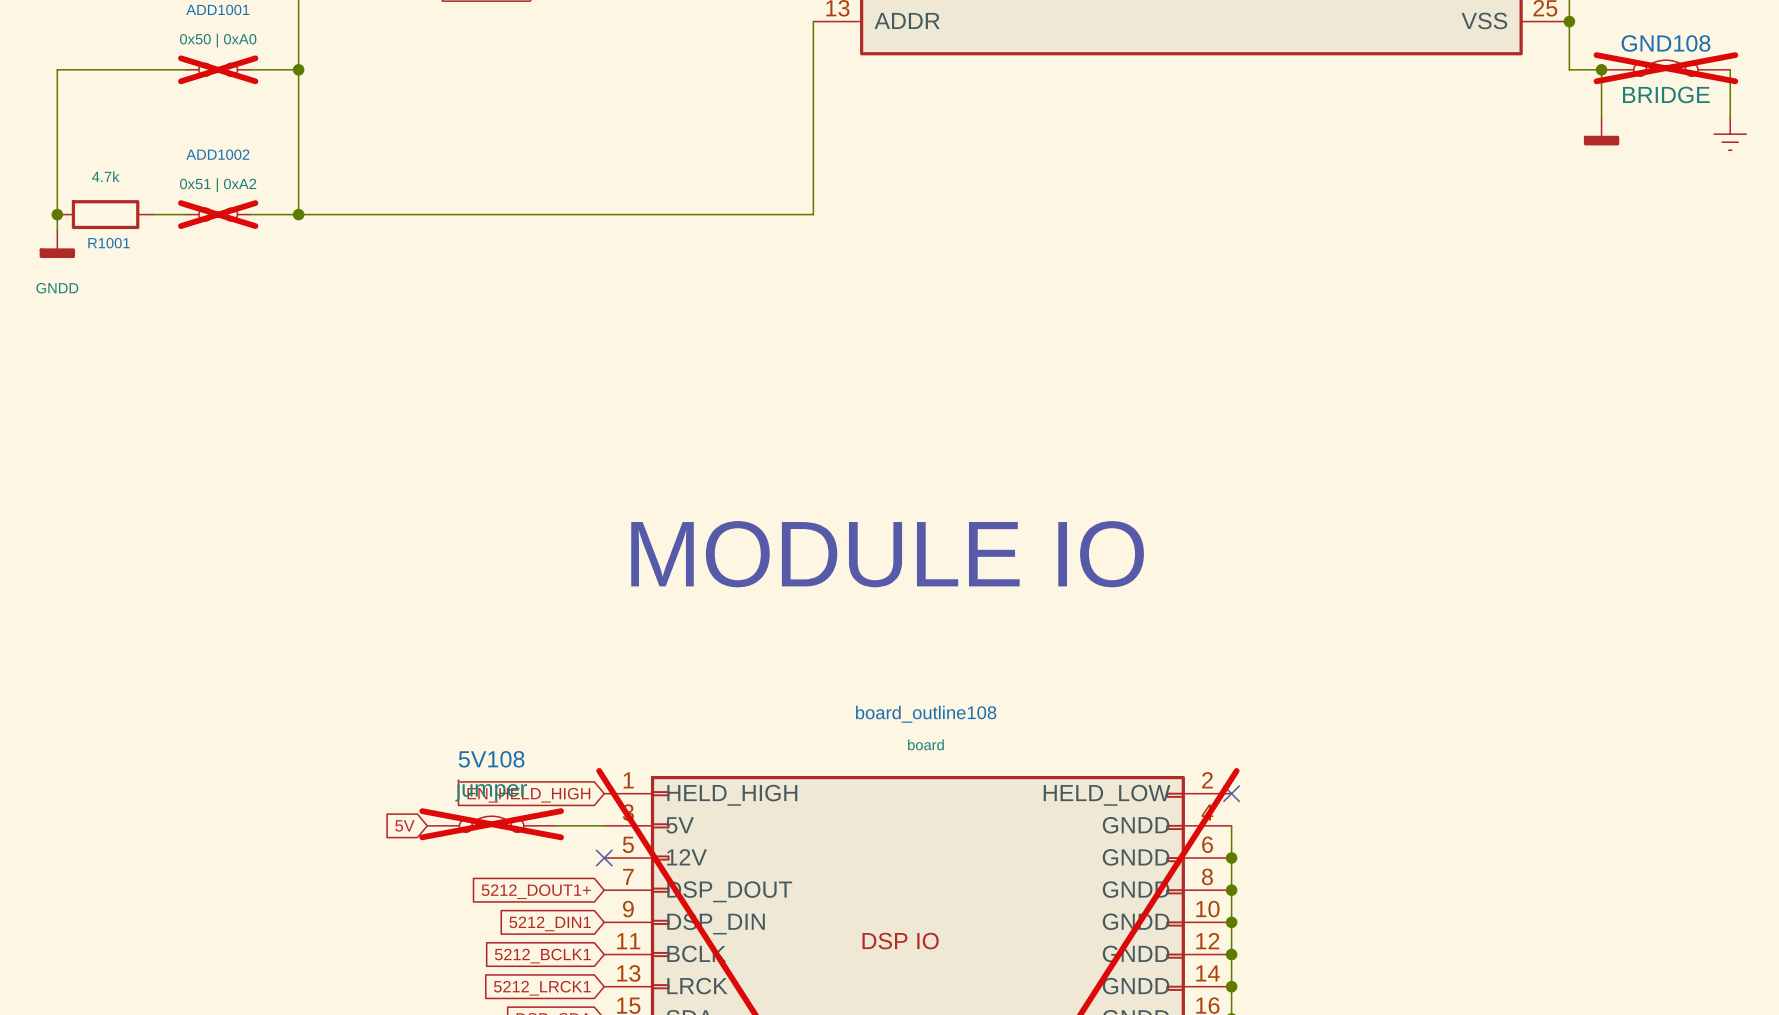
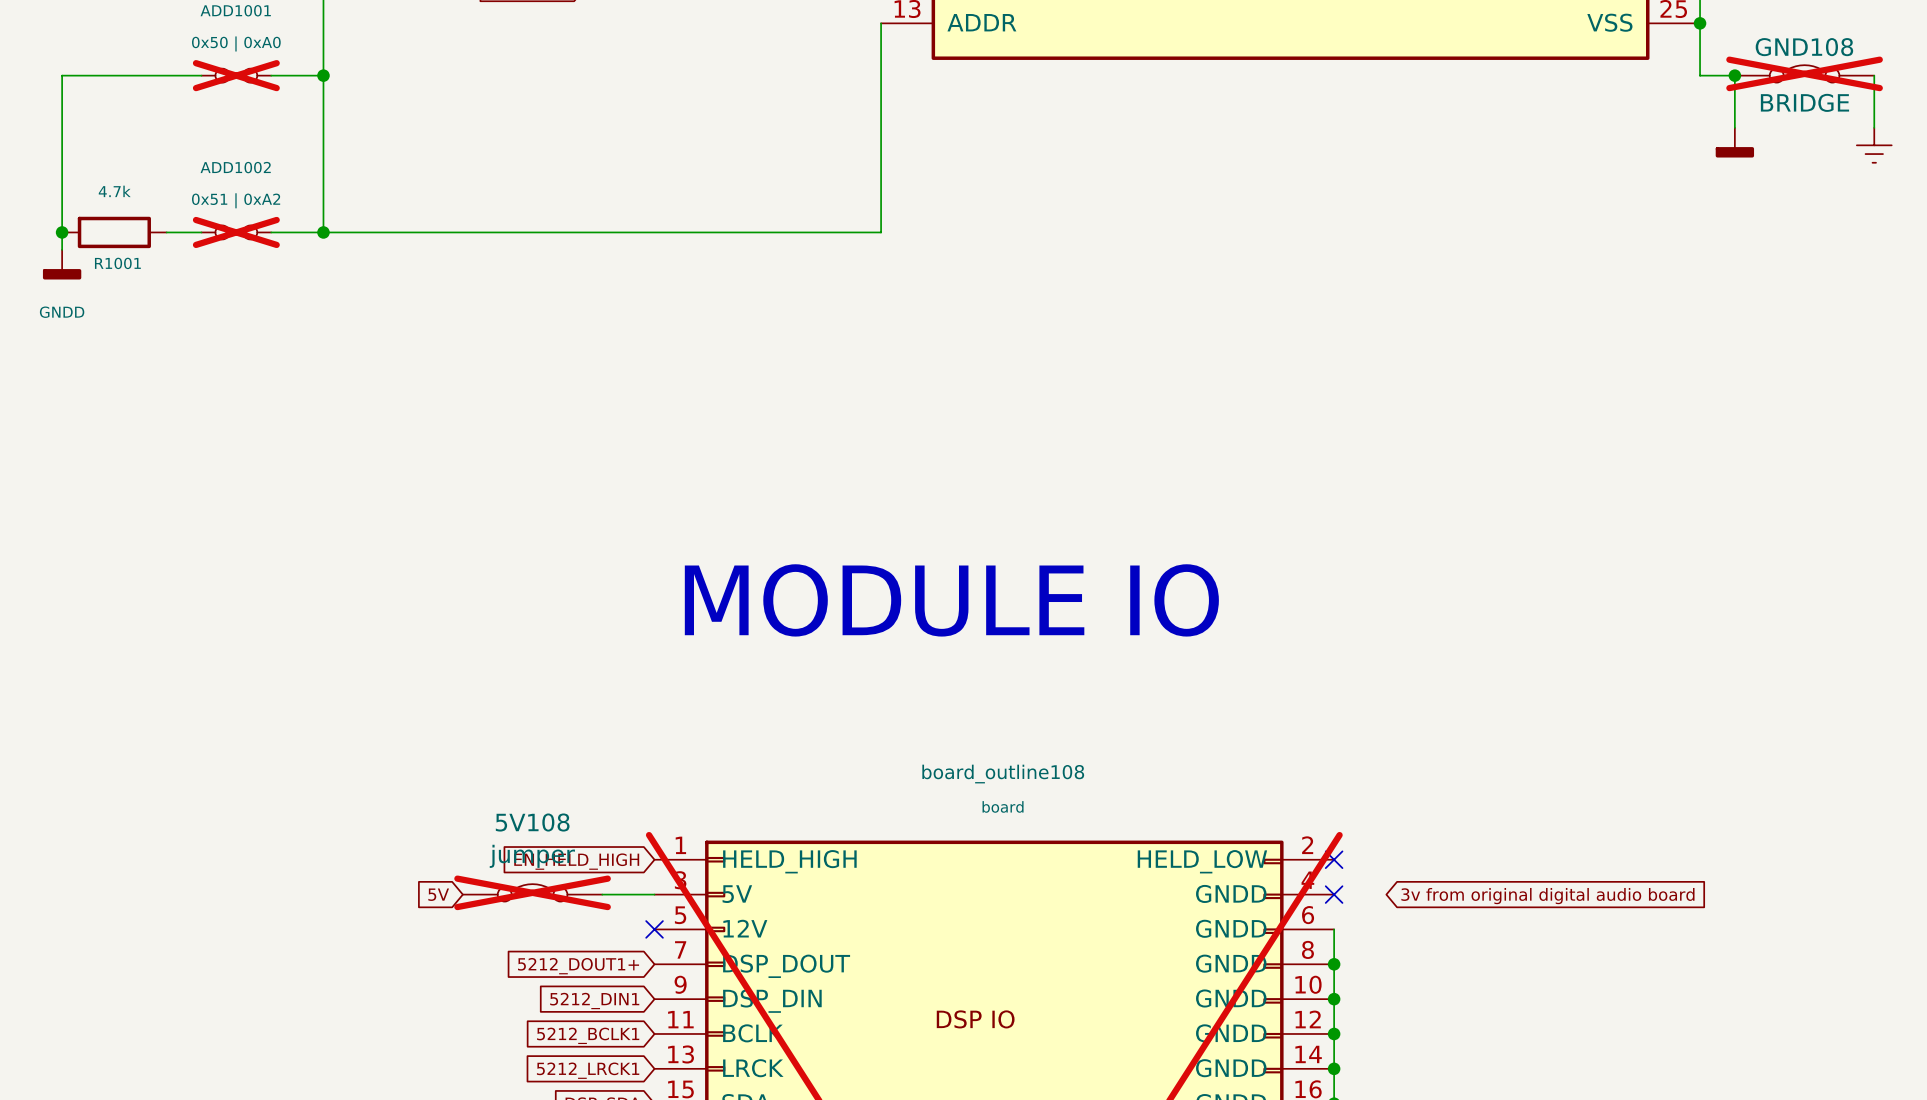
wire: (1231, 825) (1231, 858) -> none
no-connect mark: none -> (1334, 894)
global label: none -> 3v from original digital audio board (1547, 896)
junction: (1231, 858) -> none

